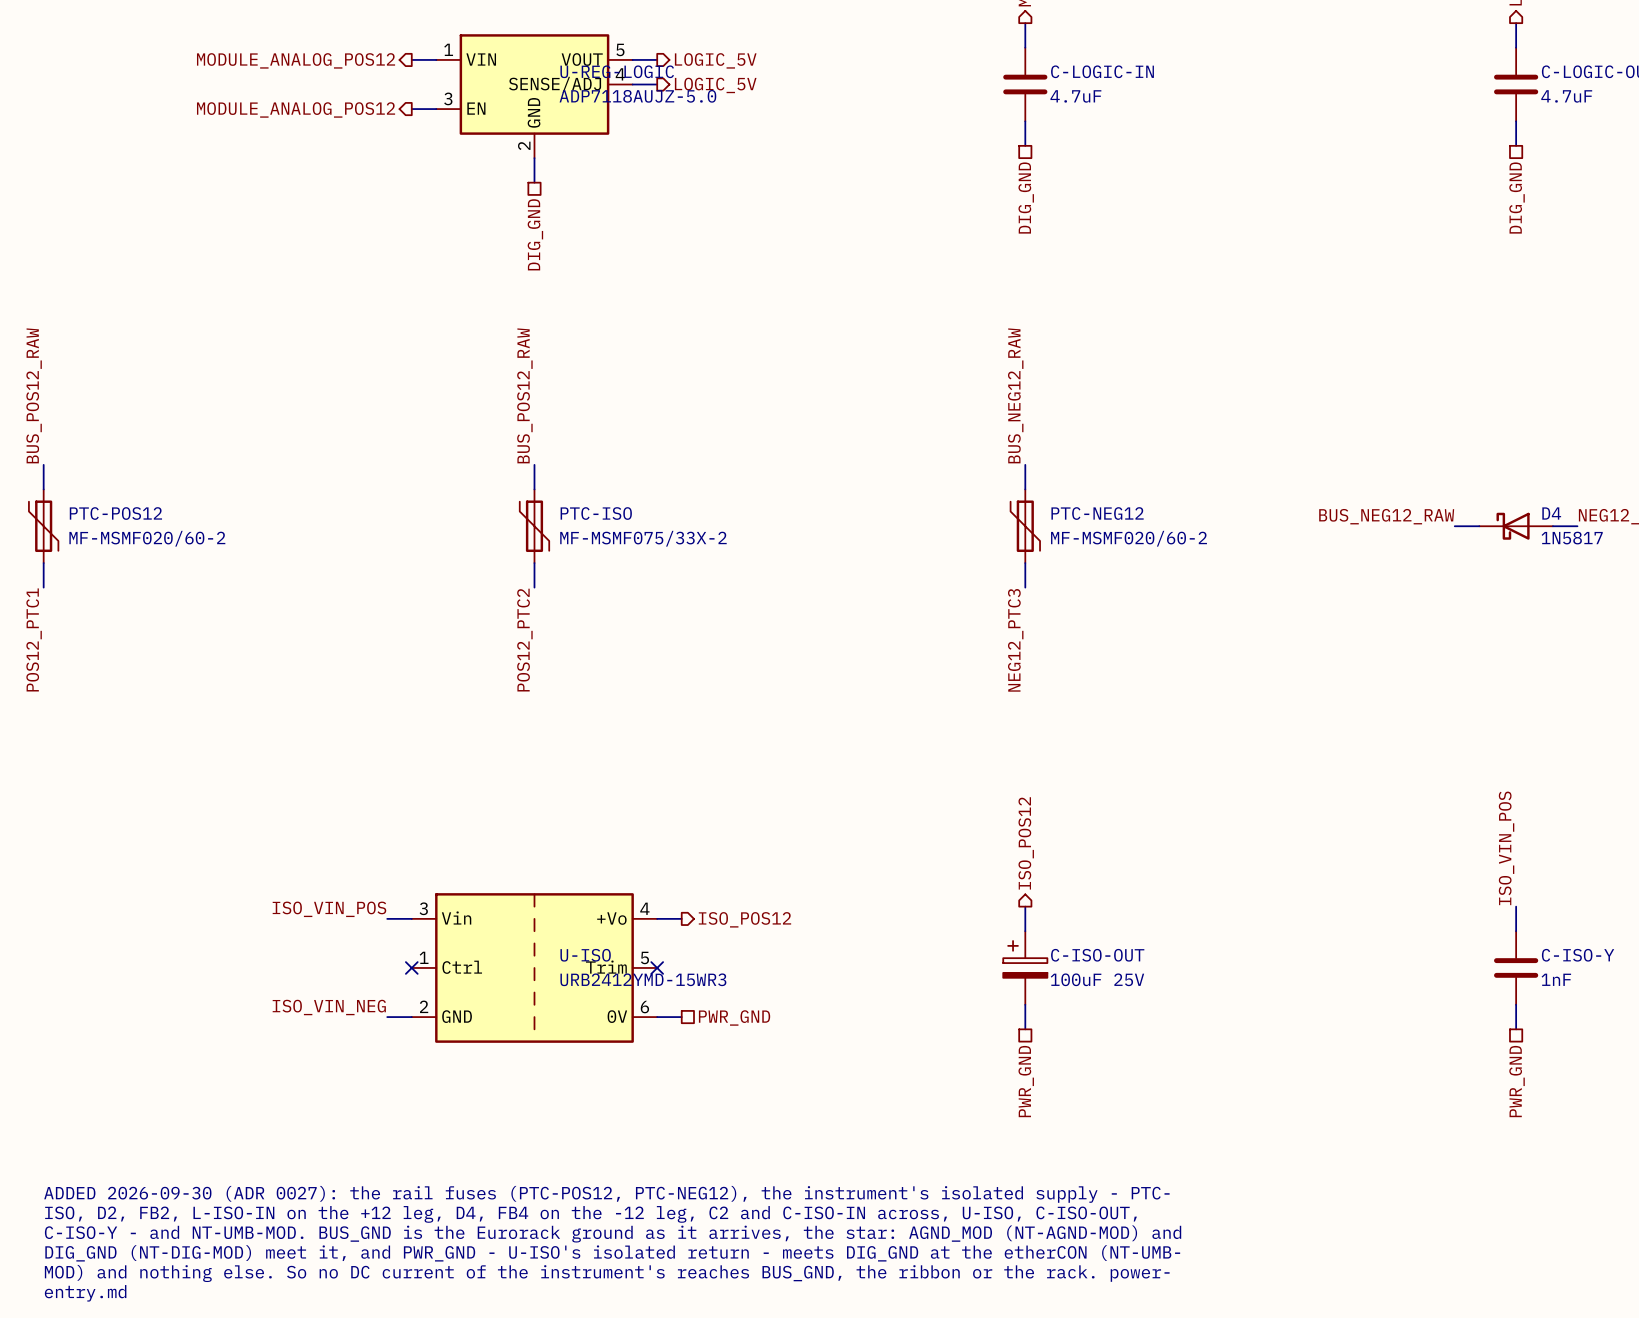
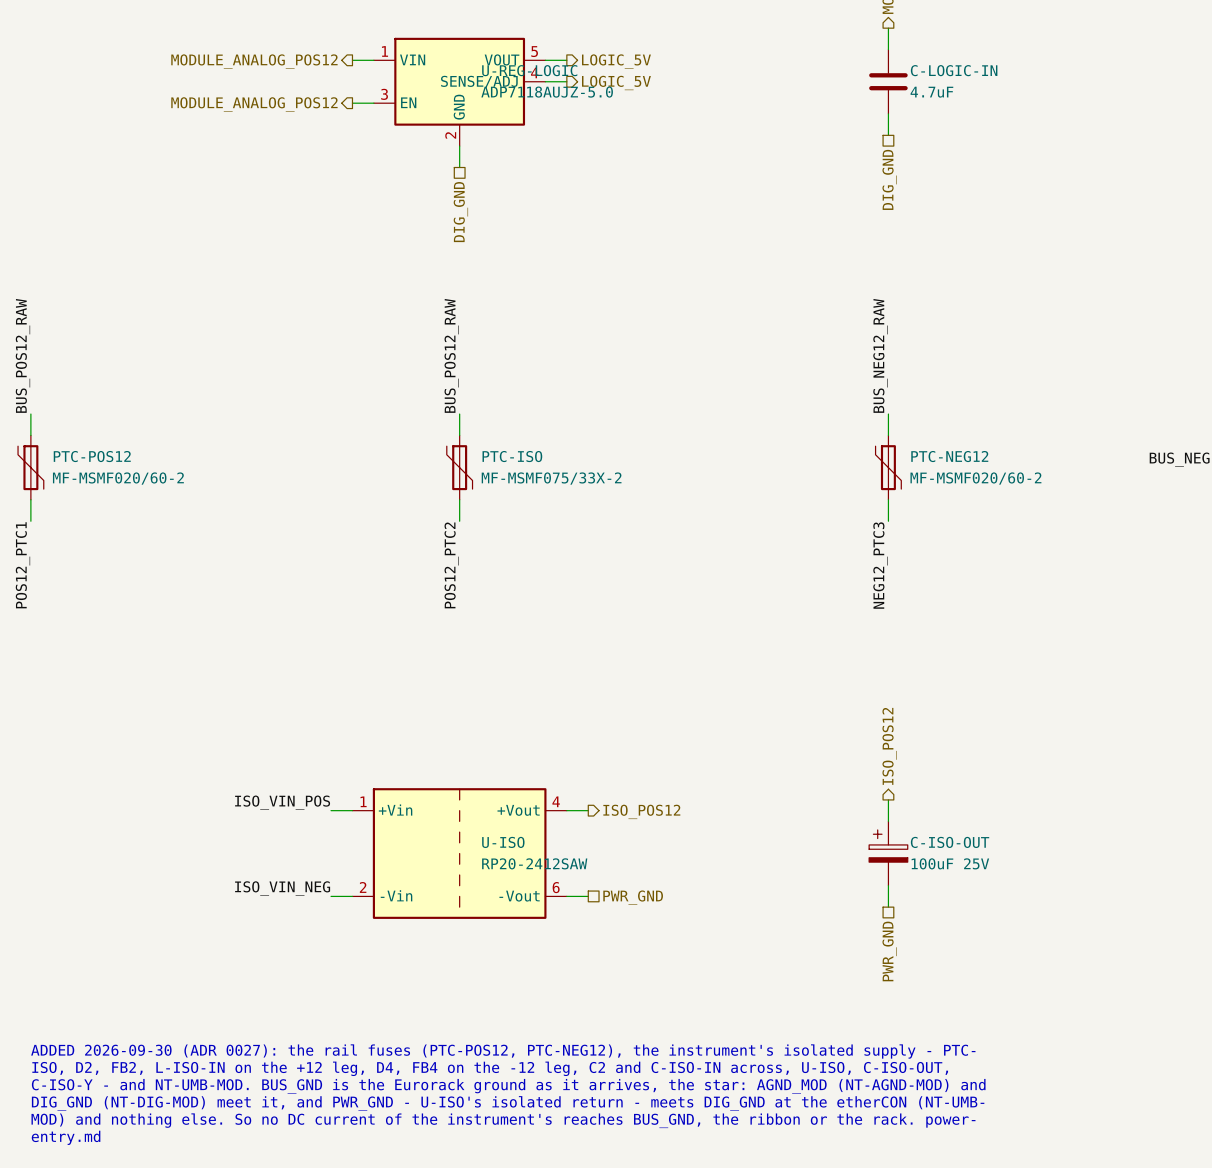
U-ISO symbol: [411, 893, 658, 1043] -> [352, 788, 567, 919]
no-connect mark: (411, 967) -> none
no-connect mark: (657, 967) -> none
U-ISO value: URB2412YMD-15WR3 (643, 979) -> RP20-2412SAW (534, 863)

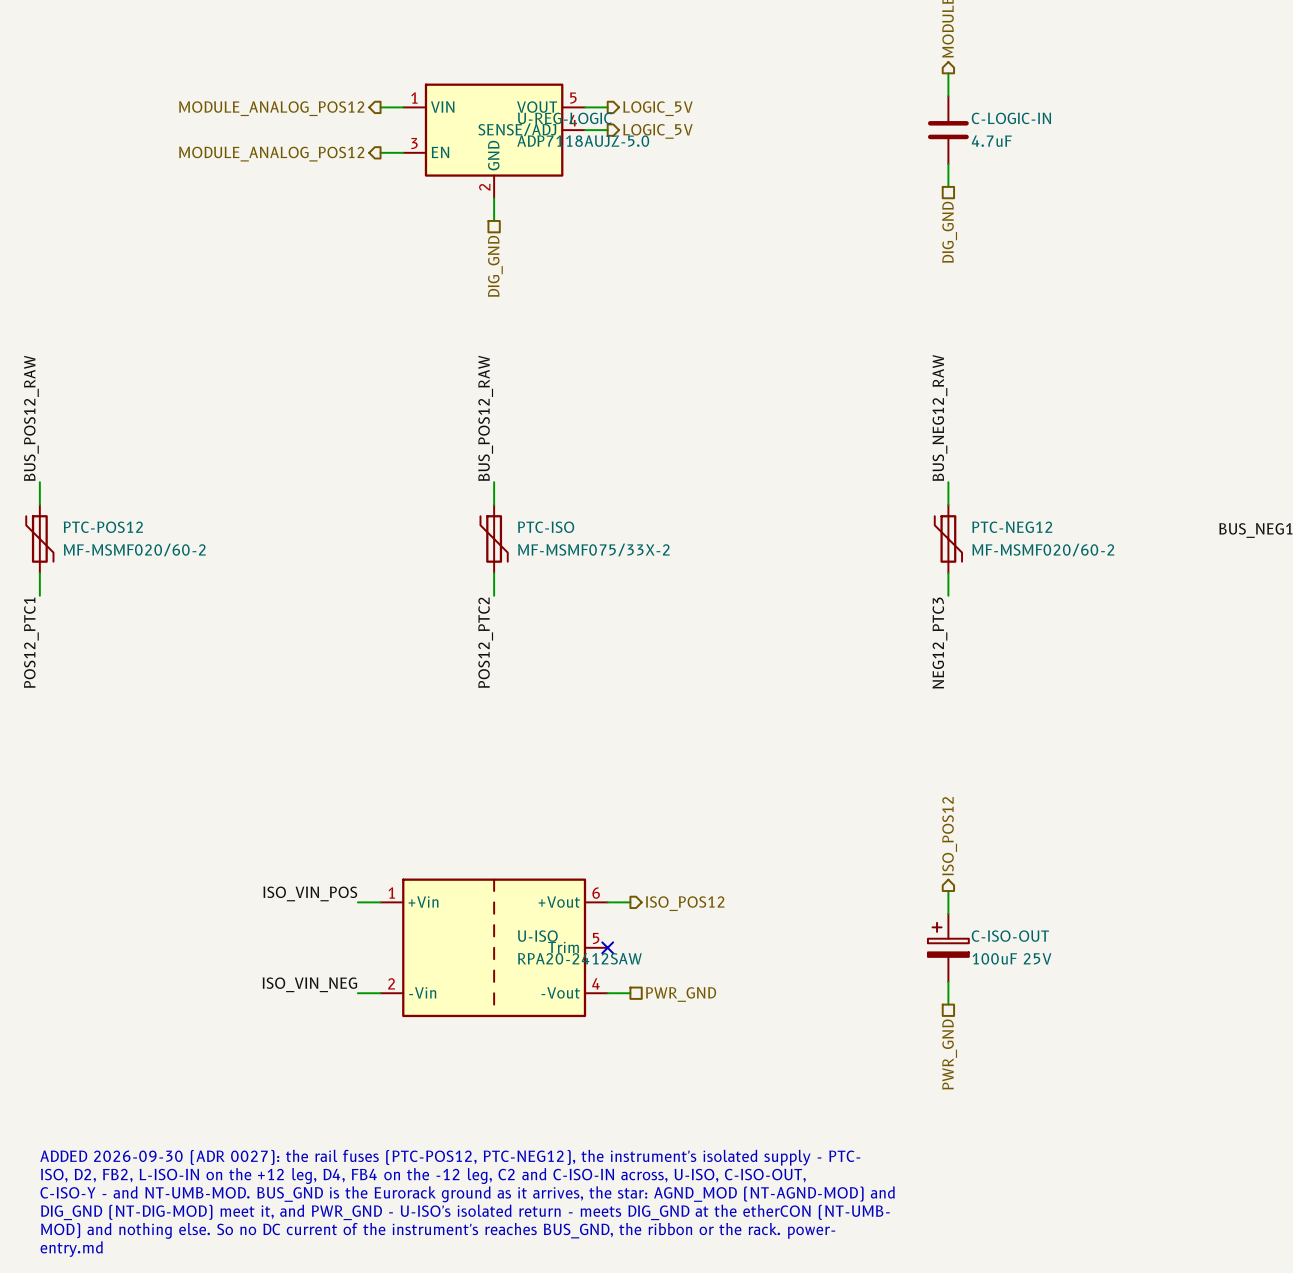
U-ISO symbol: [352, 788, 567, 919] -> [380, 878, 608, 1018]
no-connect mark: none -> (607, 947)
U-ISO value: RP20-2412SAW (534, 863) -> RPA20-2412SAW (579, 958)

